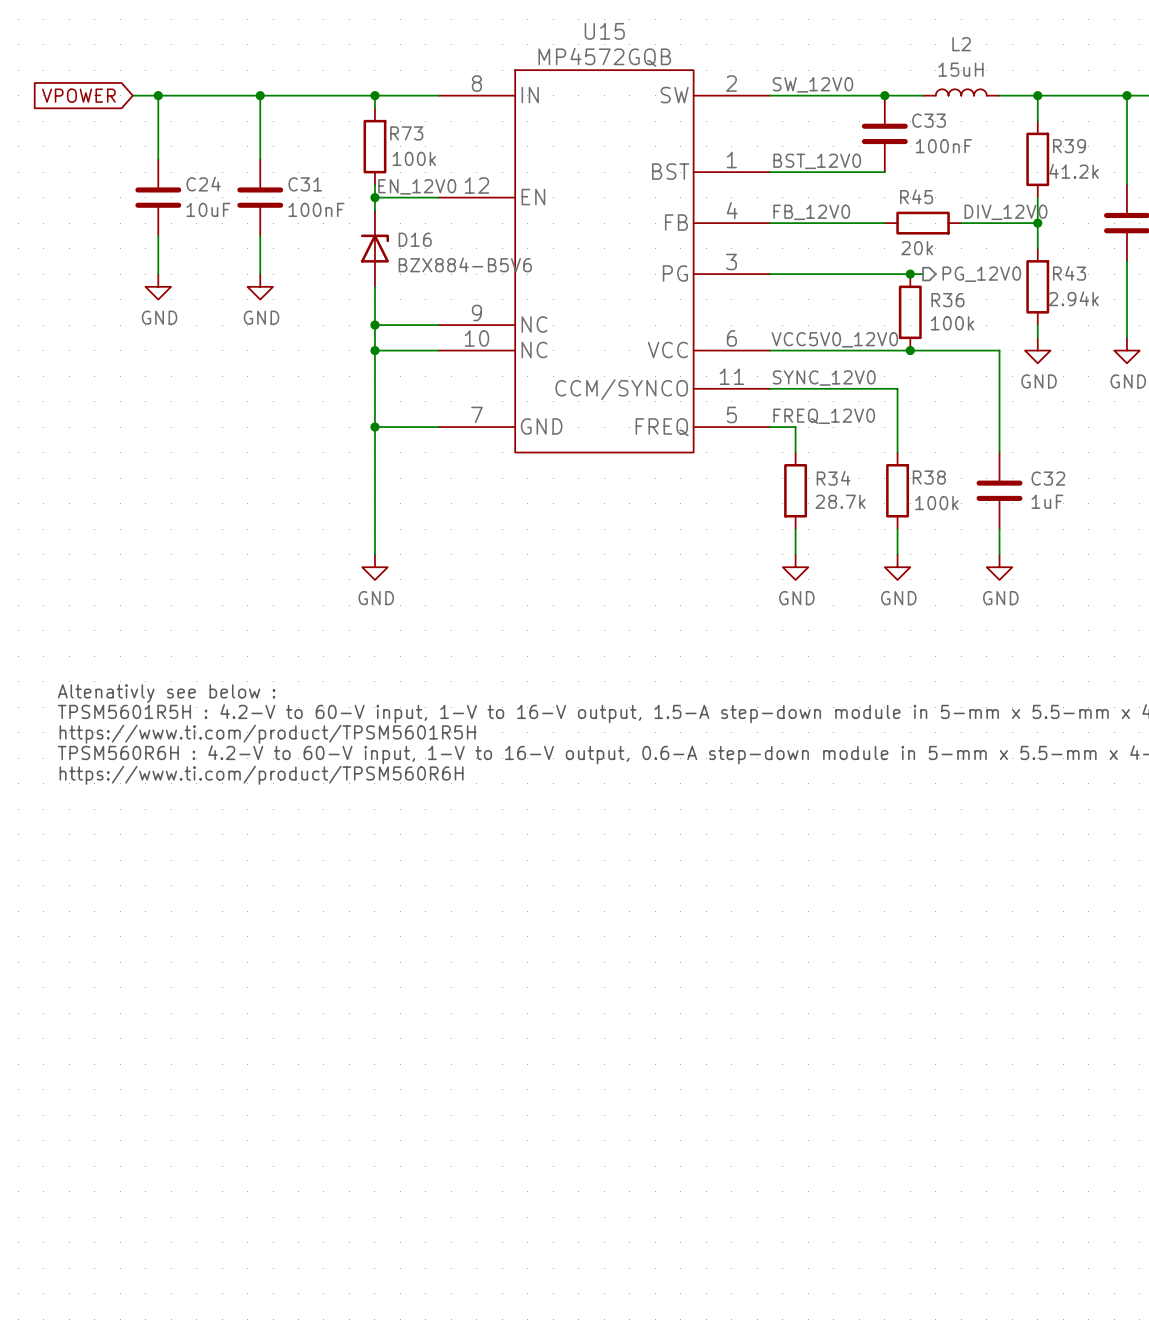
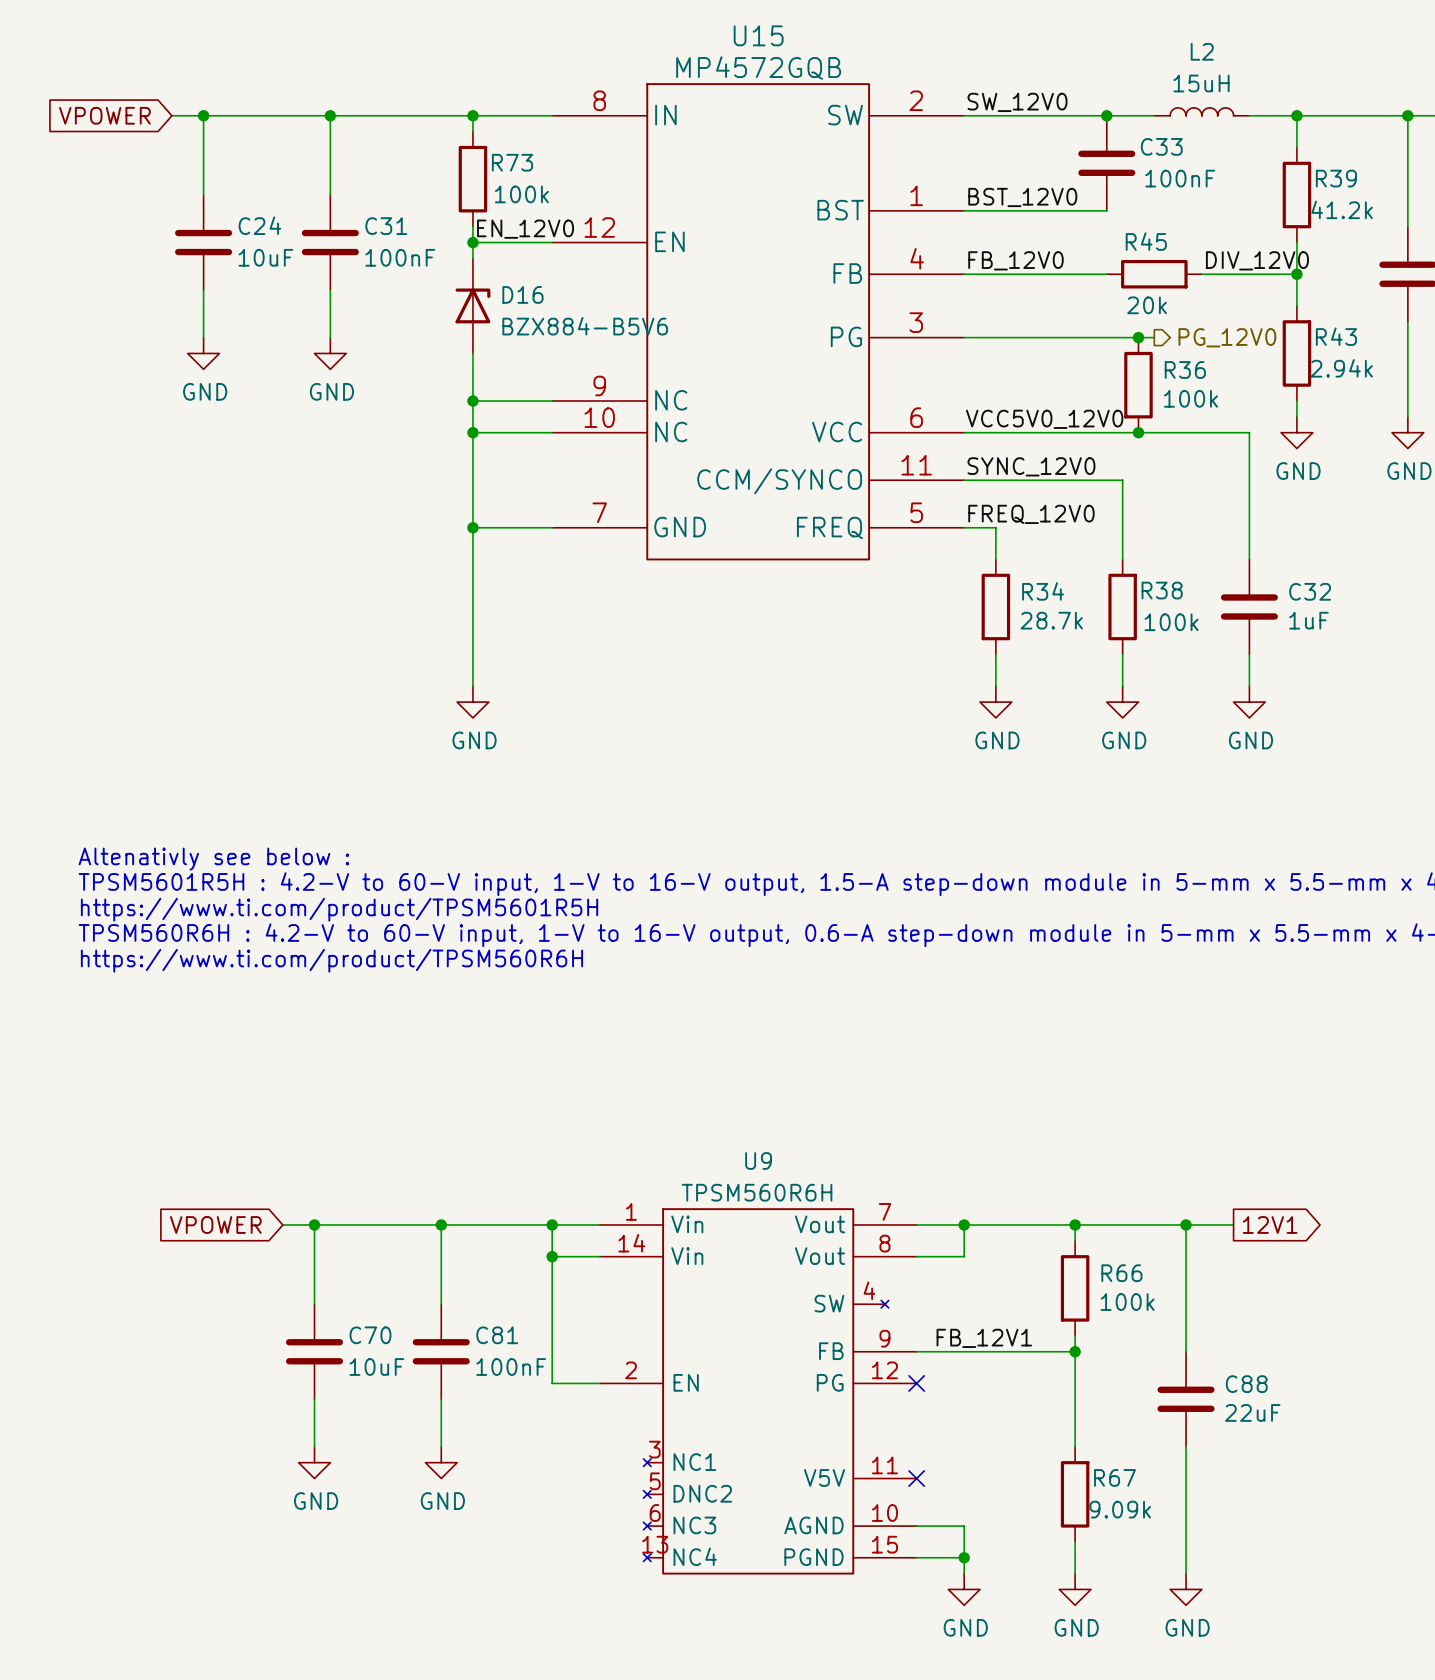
global label: none -> VPOWER (215, 1224)
wire: none -> (282, 1224) (599, 1224)
wire: none -> (314, 1224) (314, 1304)
junction: none -> (314, 1224)
wire: none -> (441, 1224) (441, 1304)
junction: none -> (441, 1224)
wire: none -> (552, 1224) (552, 1383) (599, 1383)
junction: none -> (552, 1224)
wire: none -> (916, 1224) (1233, 1224)
wire: none -> (964, 1224) (964, 1256) (916, 1256)
junction: none -> (964, 1224)
wire: none -> (1075, 1224) (1075, 1240)
junction: none -> (1075, 1224)
wire: none -> (1186, 1224) (1186, 1351)
junction: none -> (1186, 1224)
global label: none -> 12V1 (1270, 1224)
wire: none -> (552, 1256) (599, 1256)
junction: none -> (552, 1256)
R66: none -> 100k (1075, 1288)
wire: none -> (1075, 1335) (1075, 1446)
label: none -> FB_12V1 (984, 1338)
C70: none -> 10uF (314, 1351)
C81: none -> 100nF (441, 1351)
wire: none -> (916, 1351) (1075, 1351)
junction: none -> (1075, 1351)
no-connect mark: none -> (916, 1383)
U9: none -> TPSM560R6H (782, 1391)
wire: none -> (314, 1399) (314, 1446)
wire: none -> (441, 1399) (441, 1446)
C88: none -> 22uF (1186, 1399)
wire: none -> (1186, 1446) (1186, 1573)
power symbol: none -> GND (314, 1462)
power symbol: none -> GND (441, 1462)
no-connect mark: none -> (916, 1478)
R67: none -> 9.09k (1075, 1494)
wire: none -> (916, 1526) (964, 1526) (964, 1573)
wire: none -> (1075, 1541) (1075, 1573)
wire: none -> (916, 1557) (964, 1557)
junction: none -> (964, 1557)
power symbol: none -> GND (964, 1589)
power symbol: none -> GND (1075, 1589)
power symbol: none -> GND (1186, 1589)

